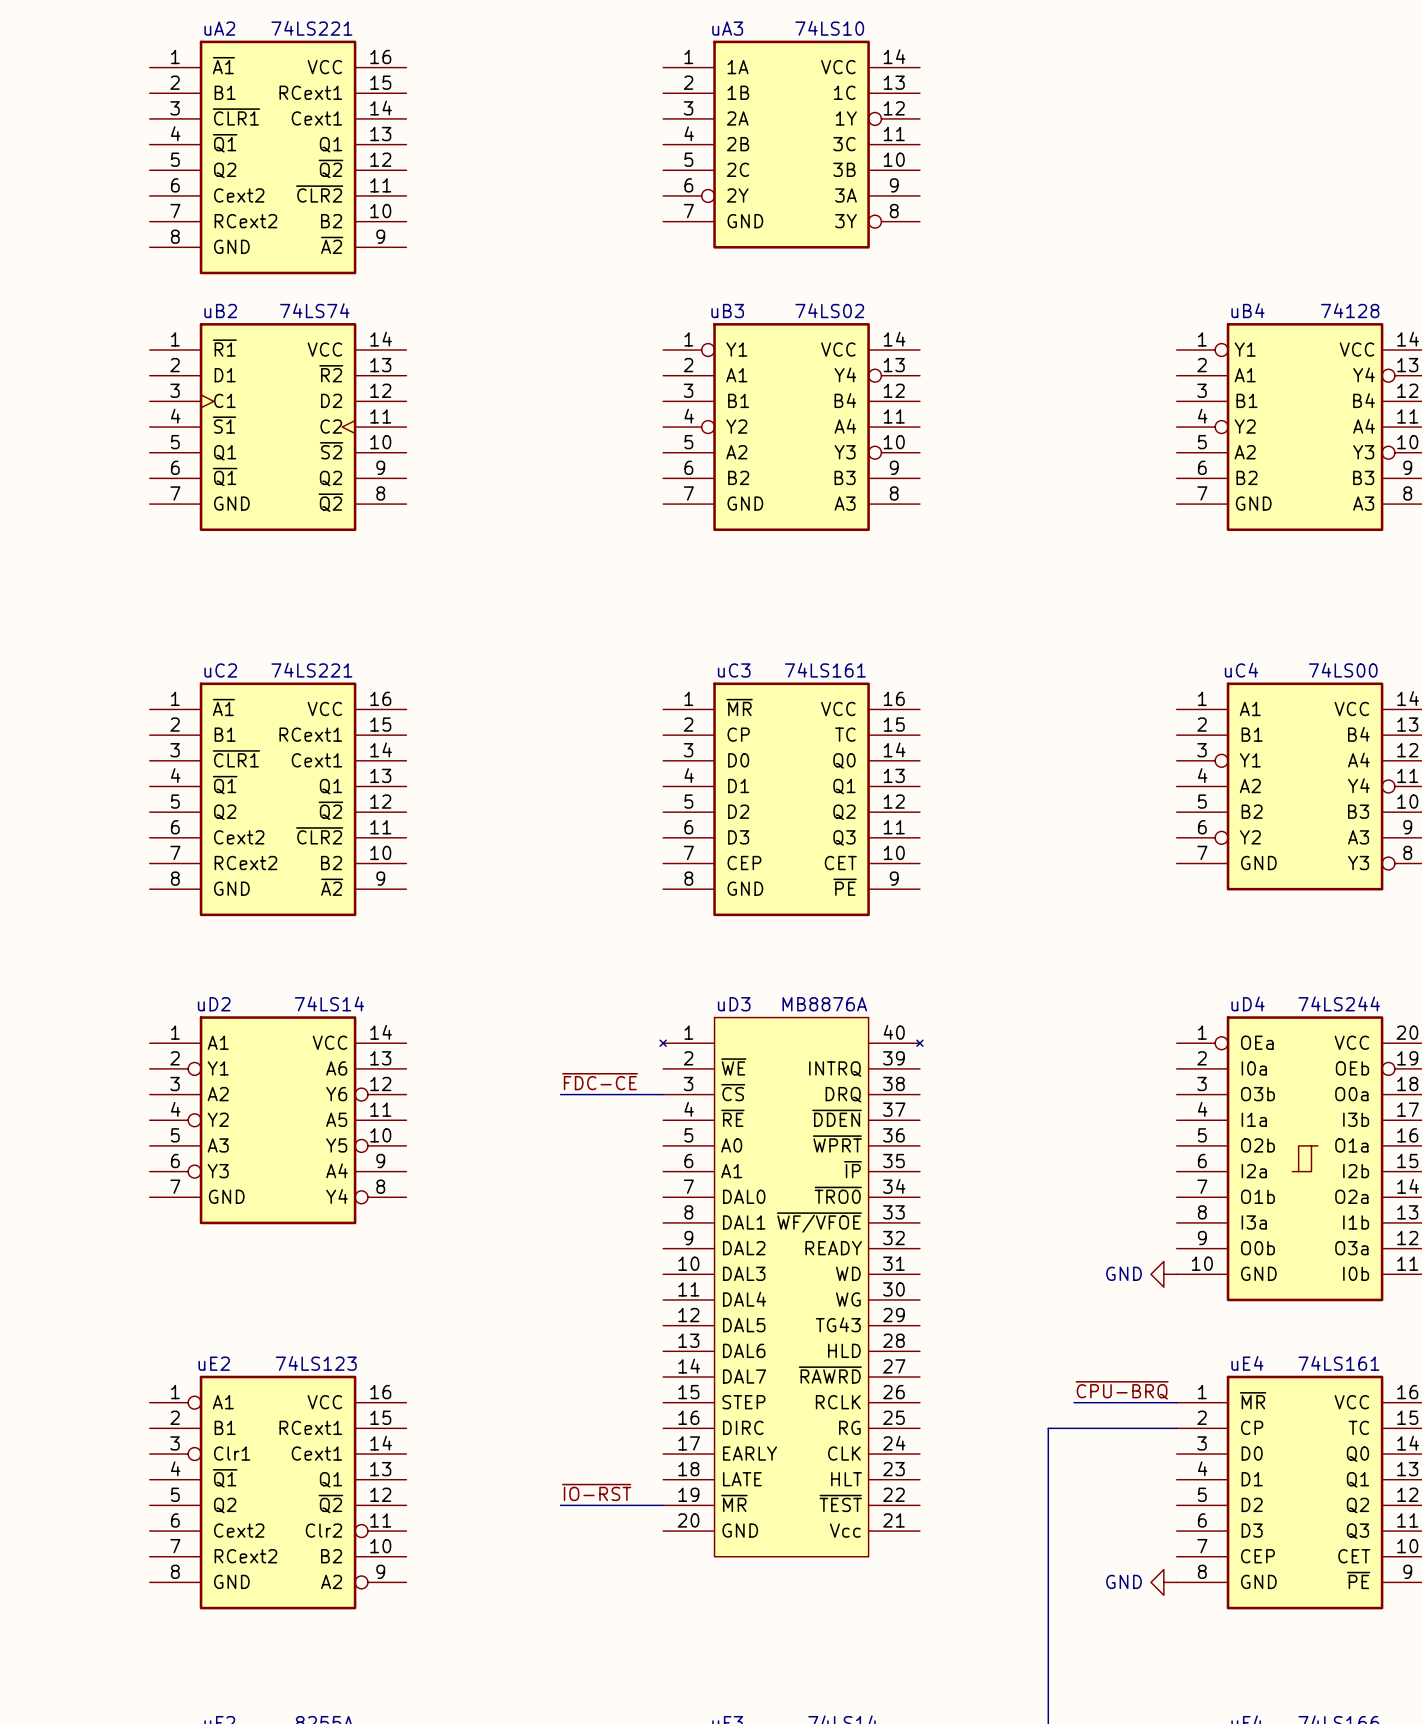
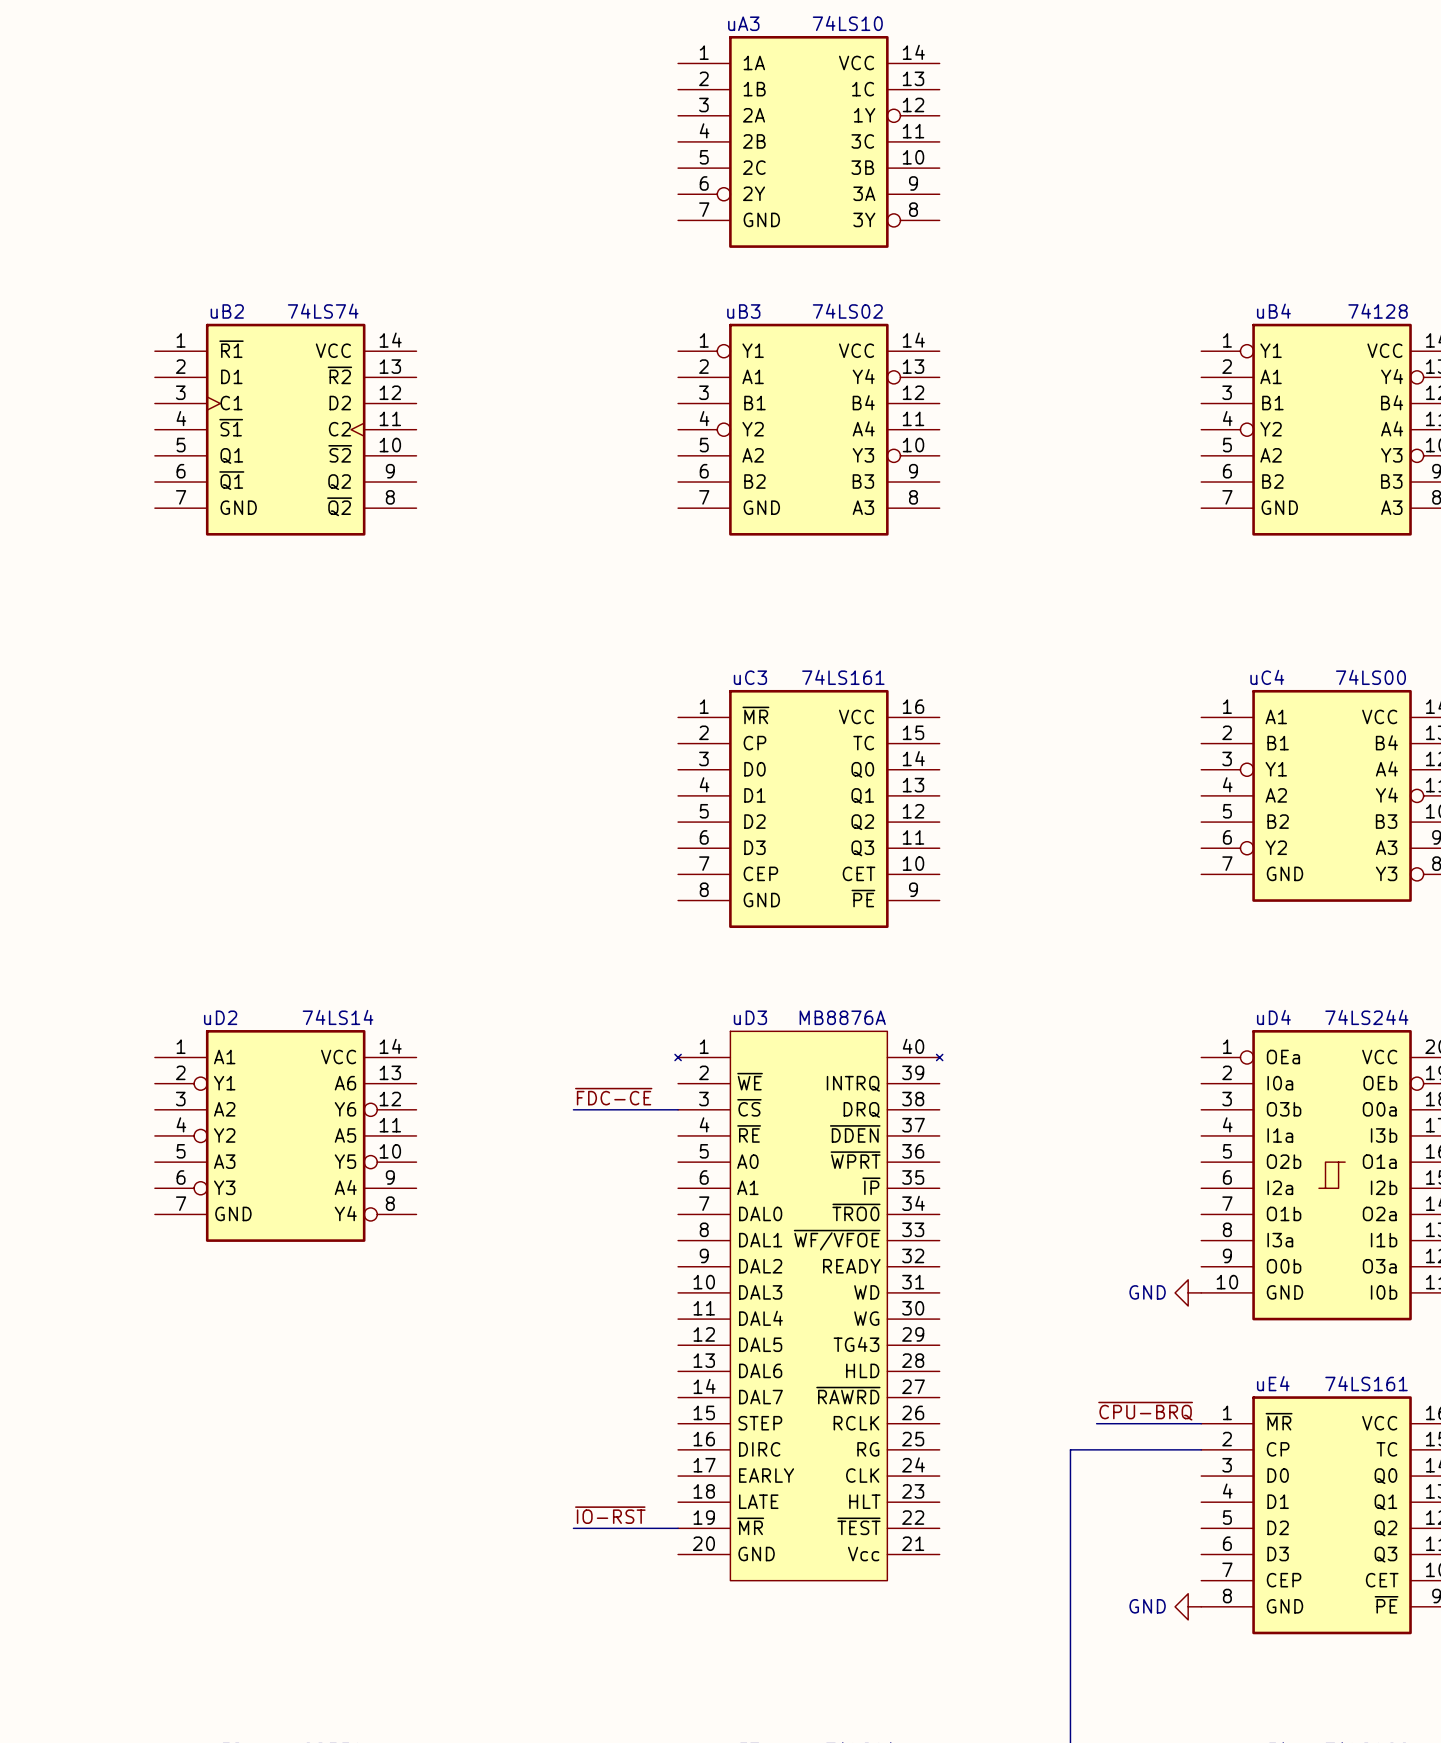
uA2: 74LS221 (278, 157) -> none
uC2: 74LS221 (278, 799) -> none
uE2: 74LS123 (278, 1492) -> none

